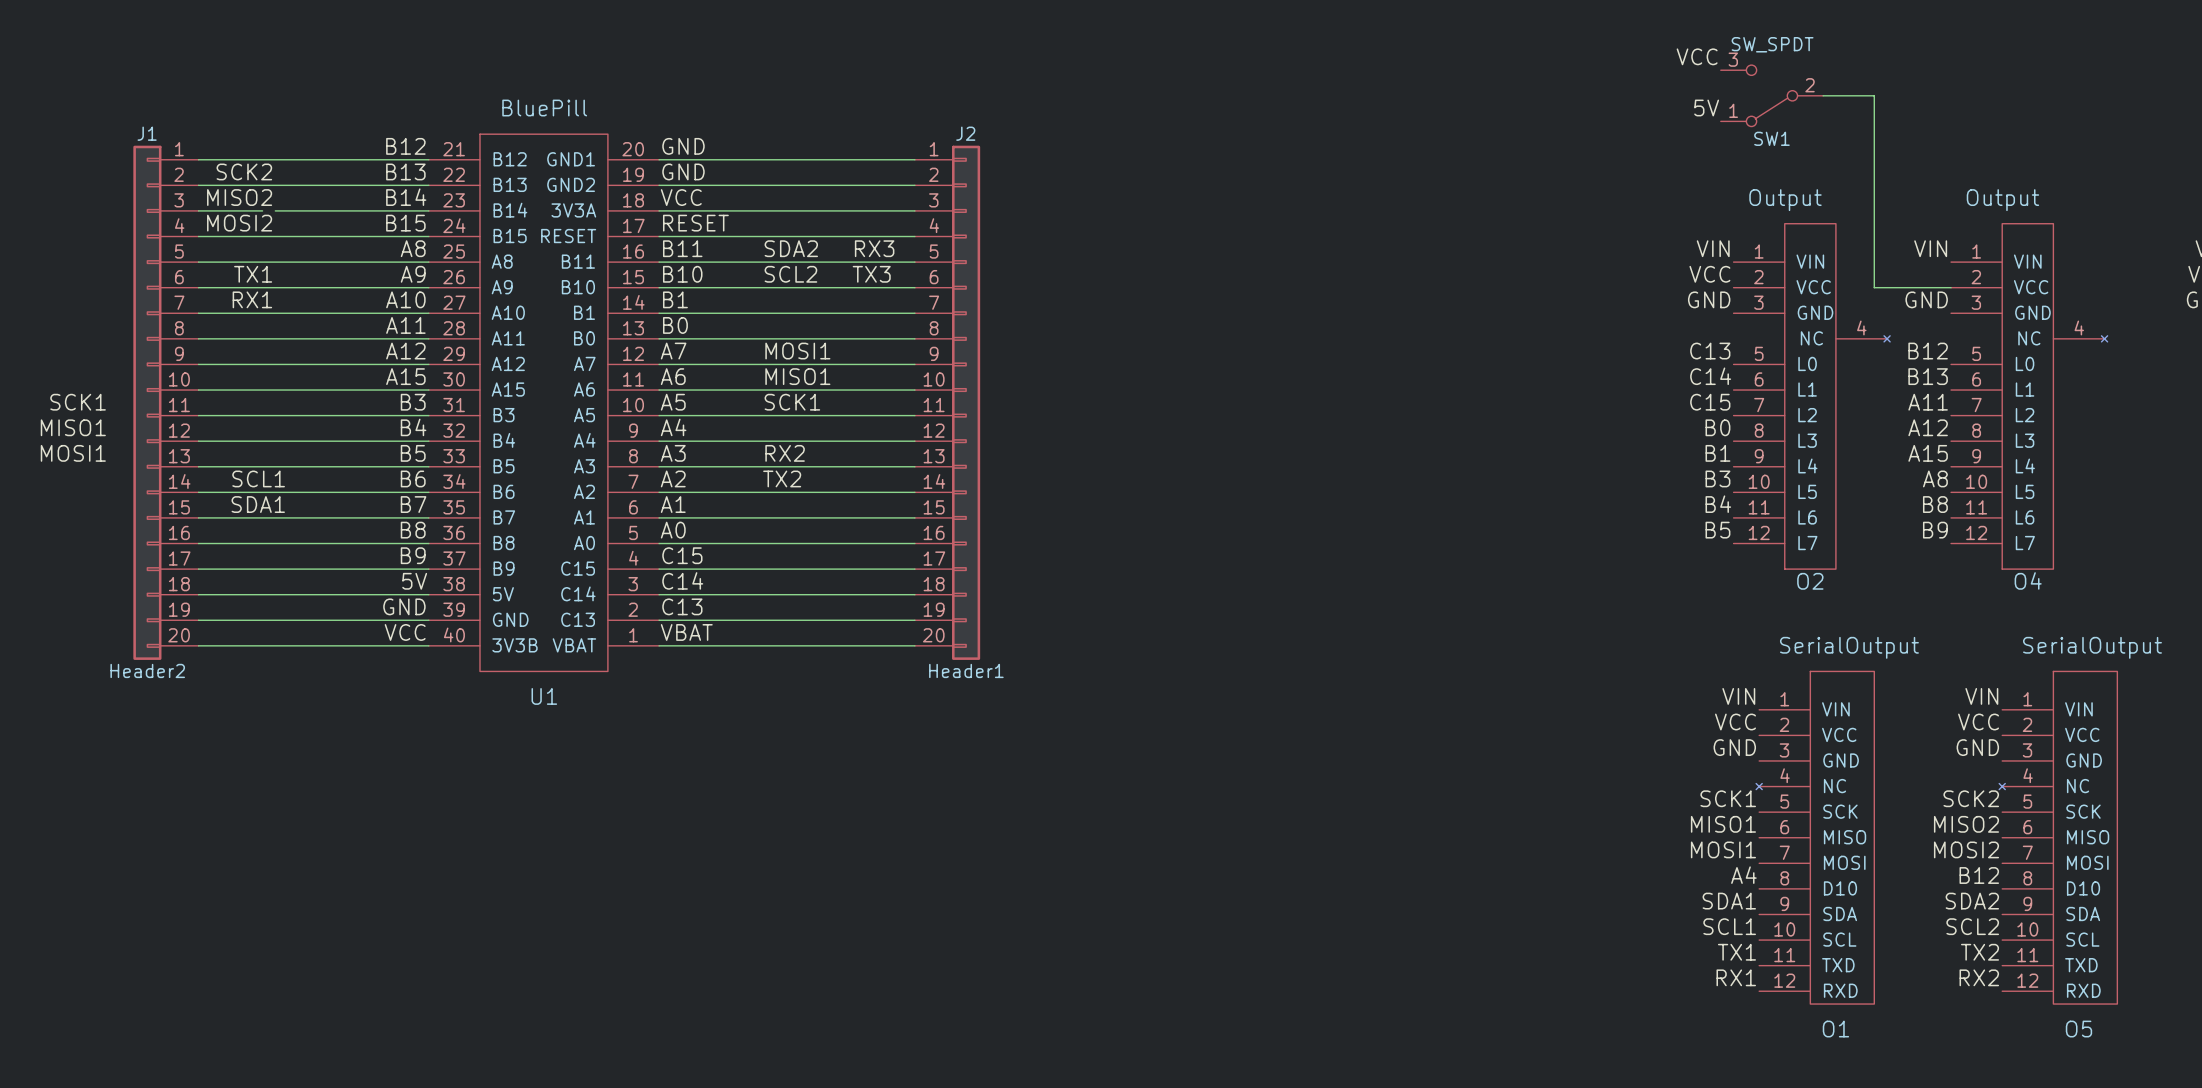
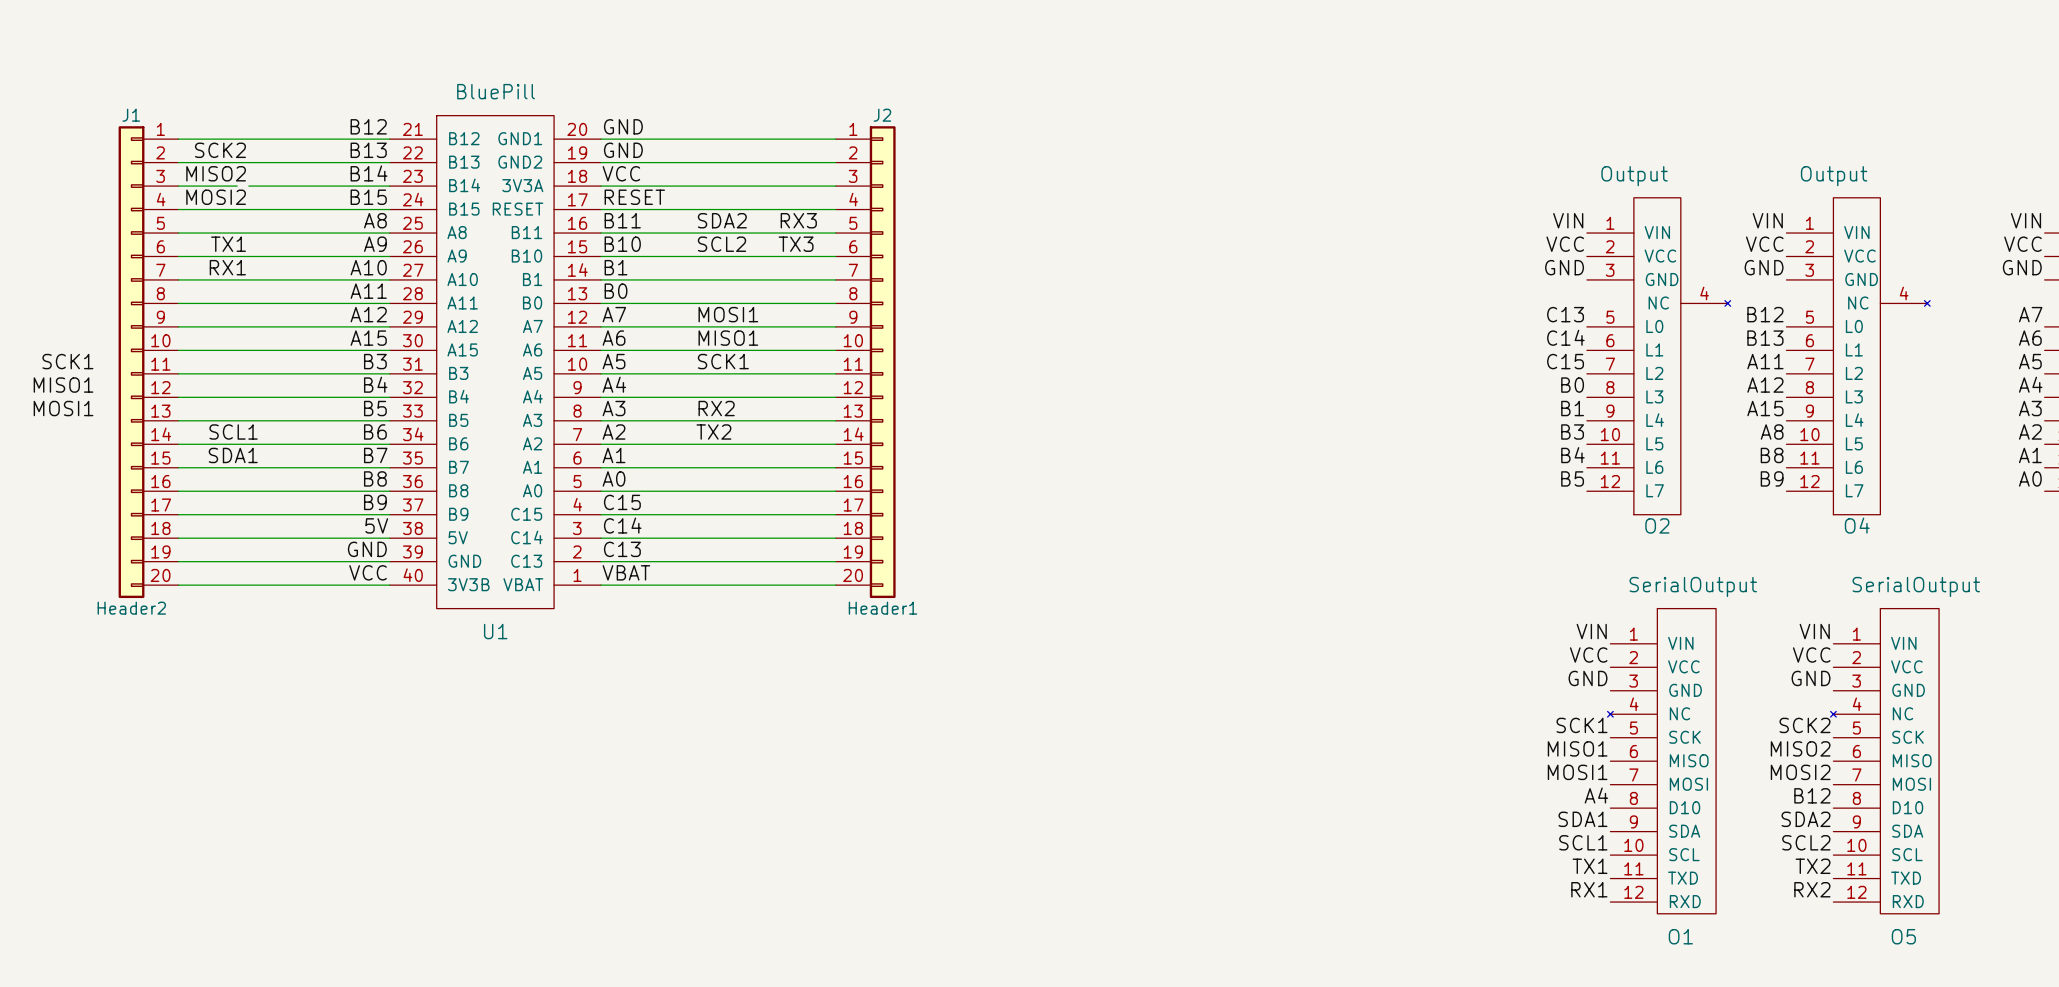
label: VCC (1697, 56) -> none
SW1: SW_SPDT (1771, 95) -> none
wire: (1823, 95) (1874, 95) (1874, 287) (1951, 287) -> none
label: 5V (1706, 108) -> none
label: none -> VCC (1764, 244)

